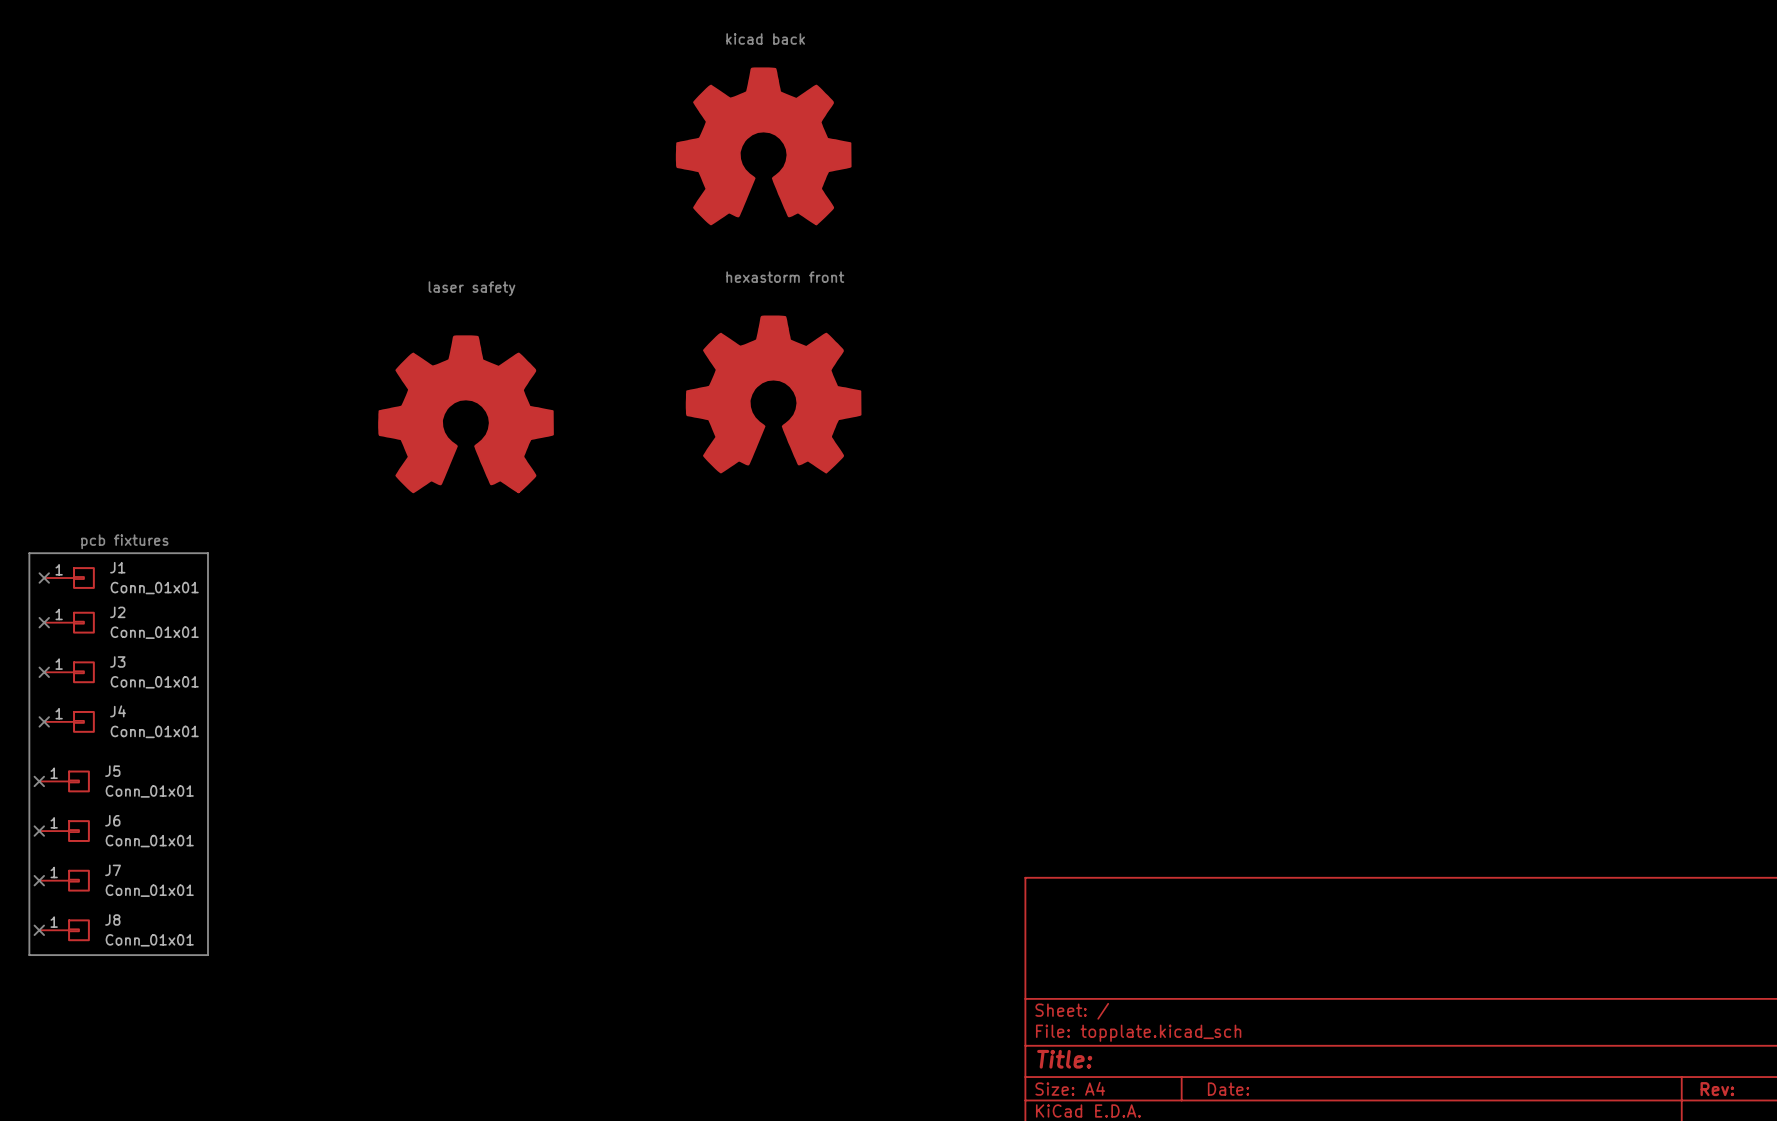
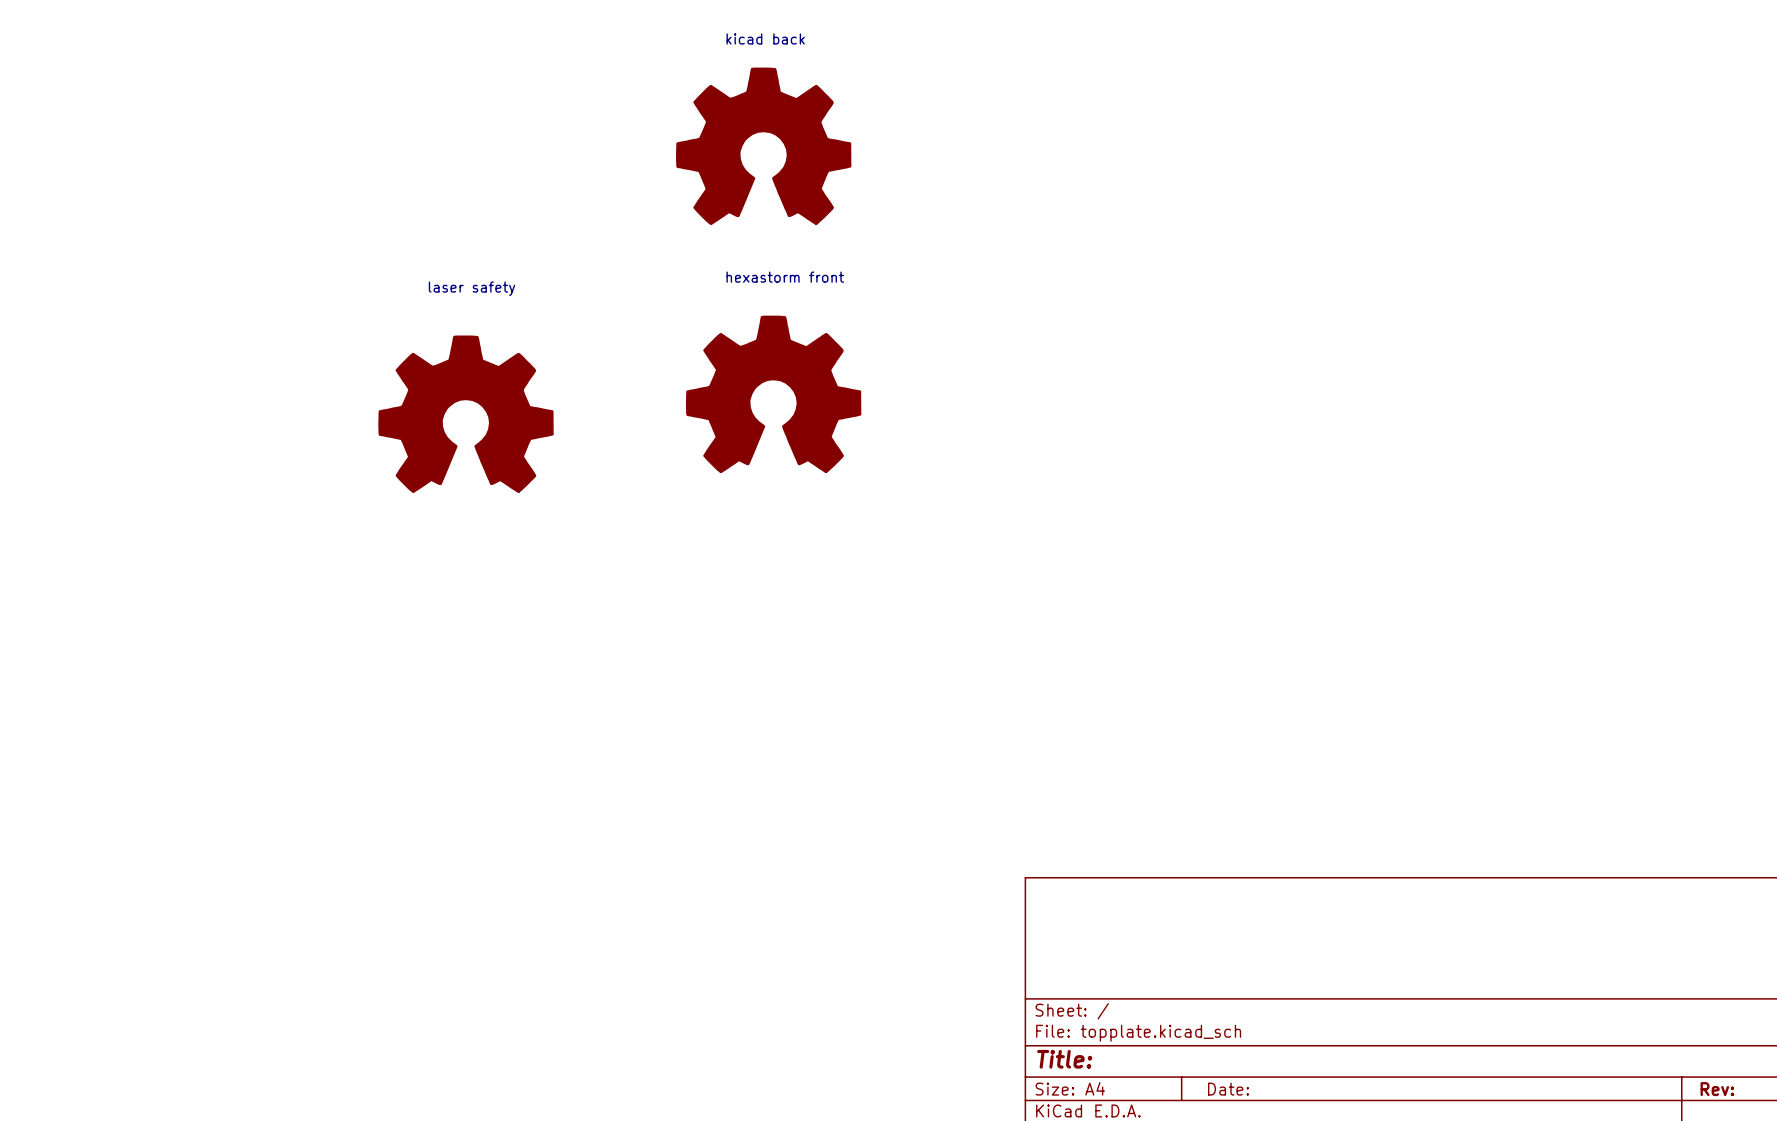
text: pcb fixtures (124, 541) -> none
line: (29, 553) (207, 553) (207, 955) (29, 955) (29, 553) -> none
no-connect mark: (44, 578) -> none
J1: Conn_01x01 (69, 578) -> none
no-connect mark: (44, 622) -> none
J2: Conn_01x01 (69, 622) -> none
no-connect mark: (44, 672) -> none
J3: Conn_01x01 (69, 672) -> none
no-connect mark: (44, 721) -> none
J4: Conn_01x01 (69, 721) -> none
no-connect mark: (39, 781) -> none
J5: Conn_01x01 (64, 781) -> none
no-connect mark: (39, 831) -> none
J6: Conn_01x01 (64, 831) -> none
no-connect mark: (39, 880) -> none
J7: Conn_01x01 (64, 880) -> none
no-connect mark: (39, 930) -> none
J8: Conn_01x01 (64, 930) -> none

